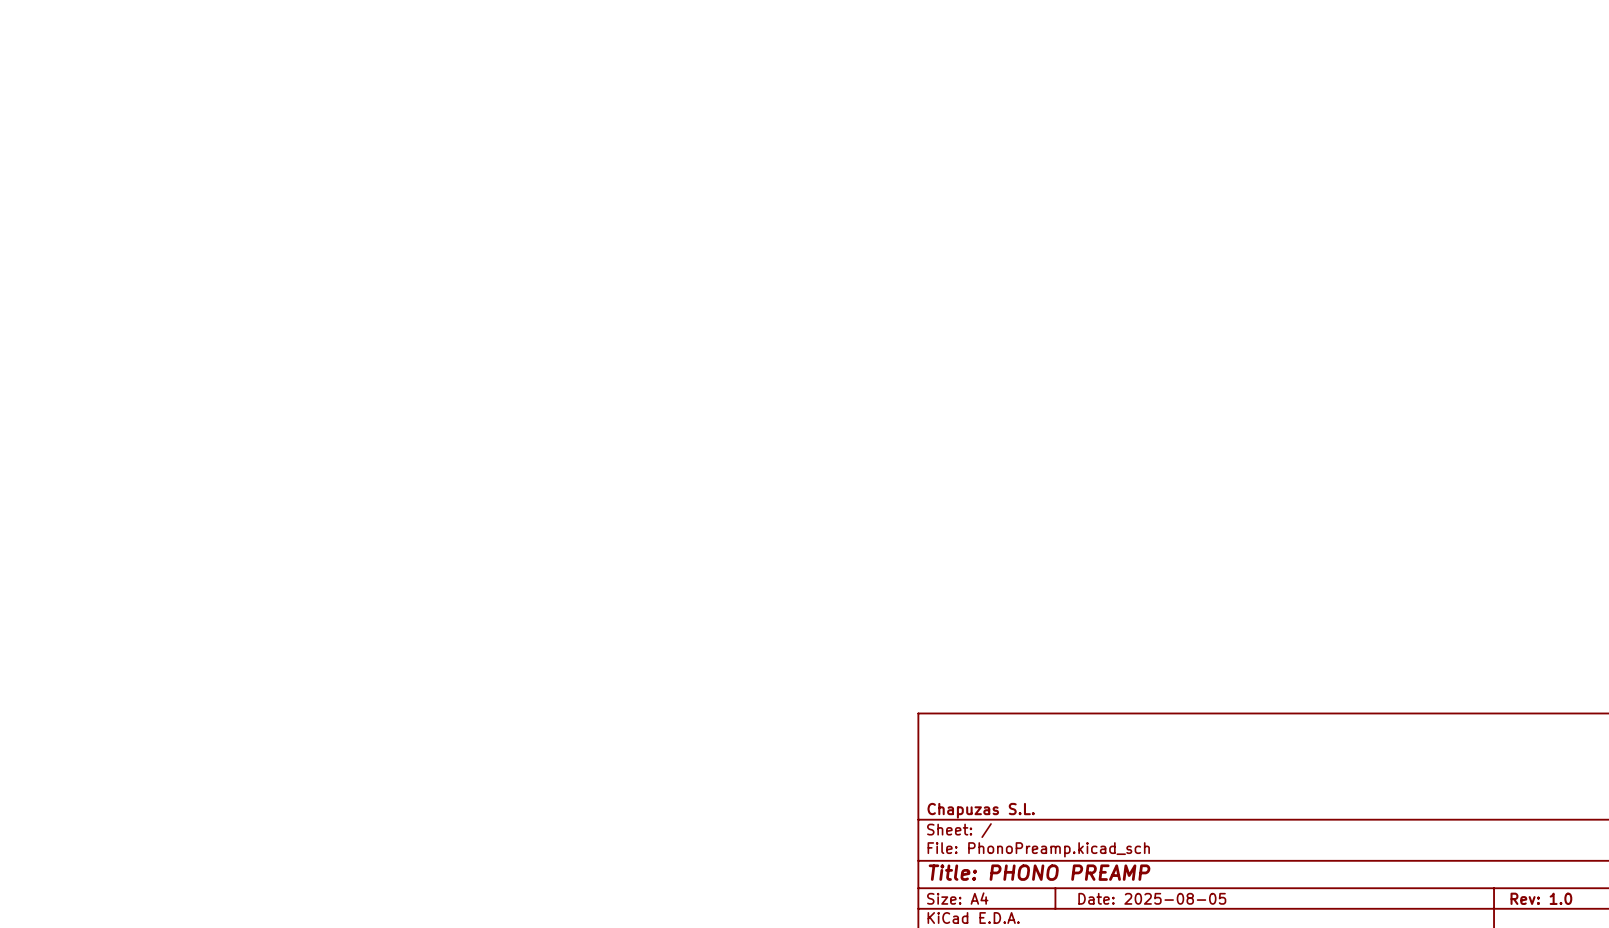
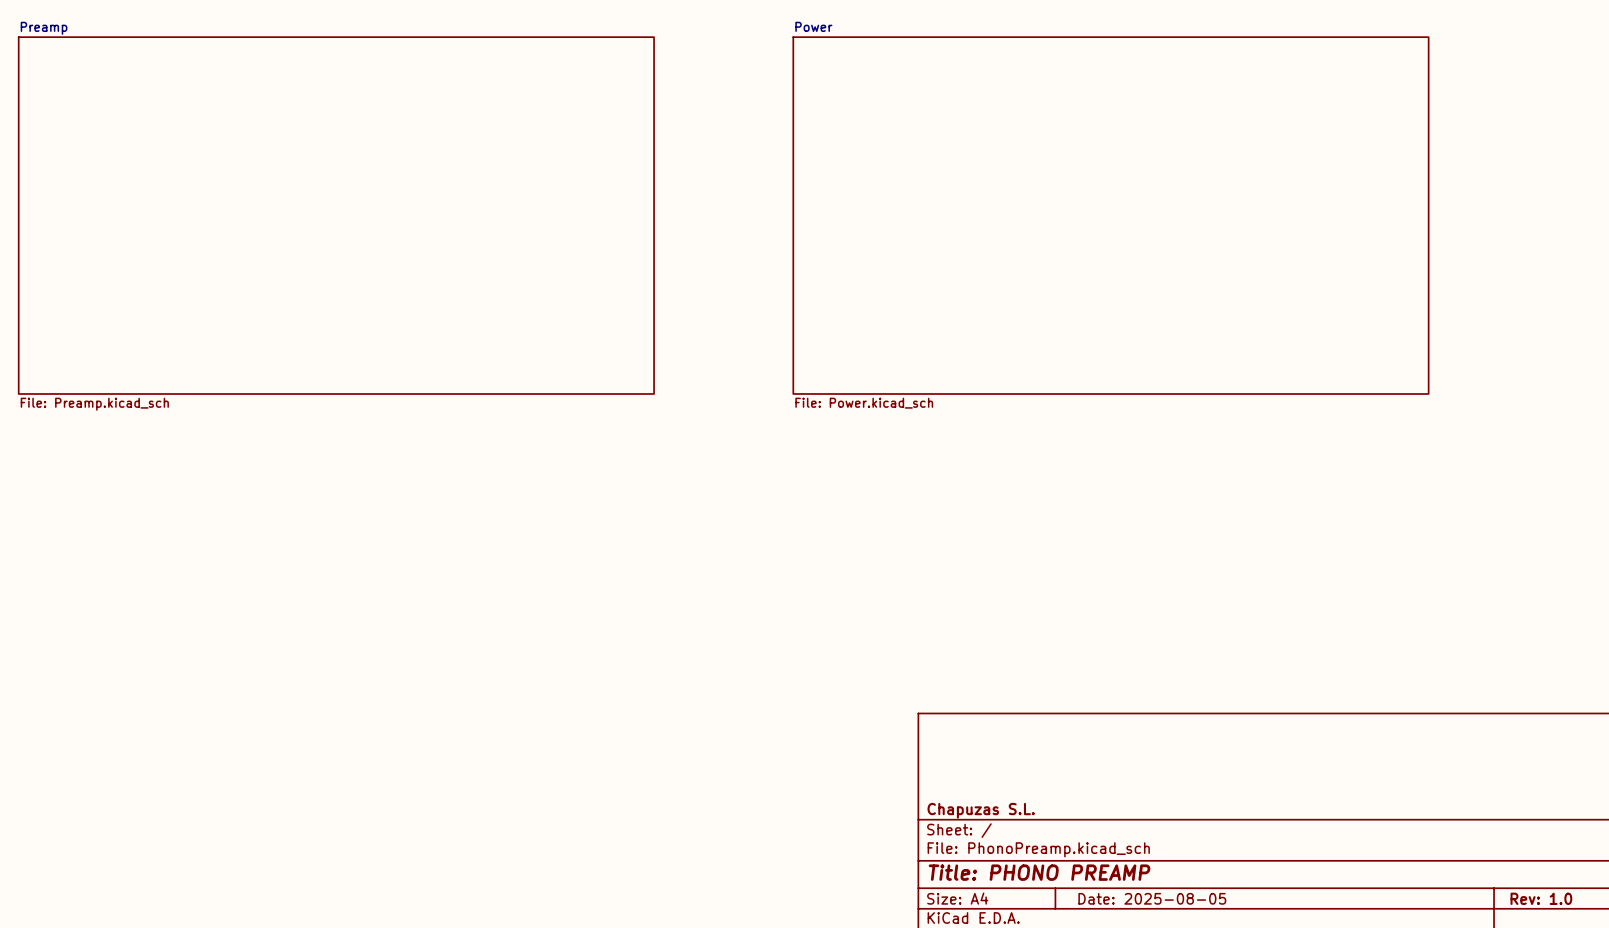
sheet Preamp: none -> File: Preamp.kicad_sch (336, 215)
sheet Power: none -> File: Power.kicad_sch (1110, 215)

